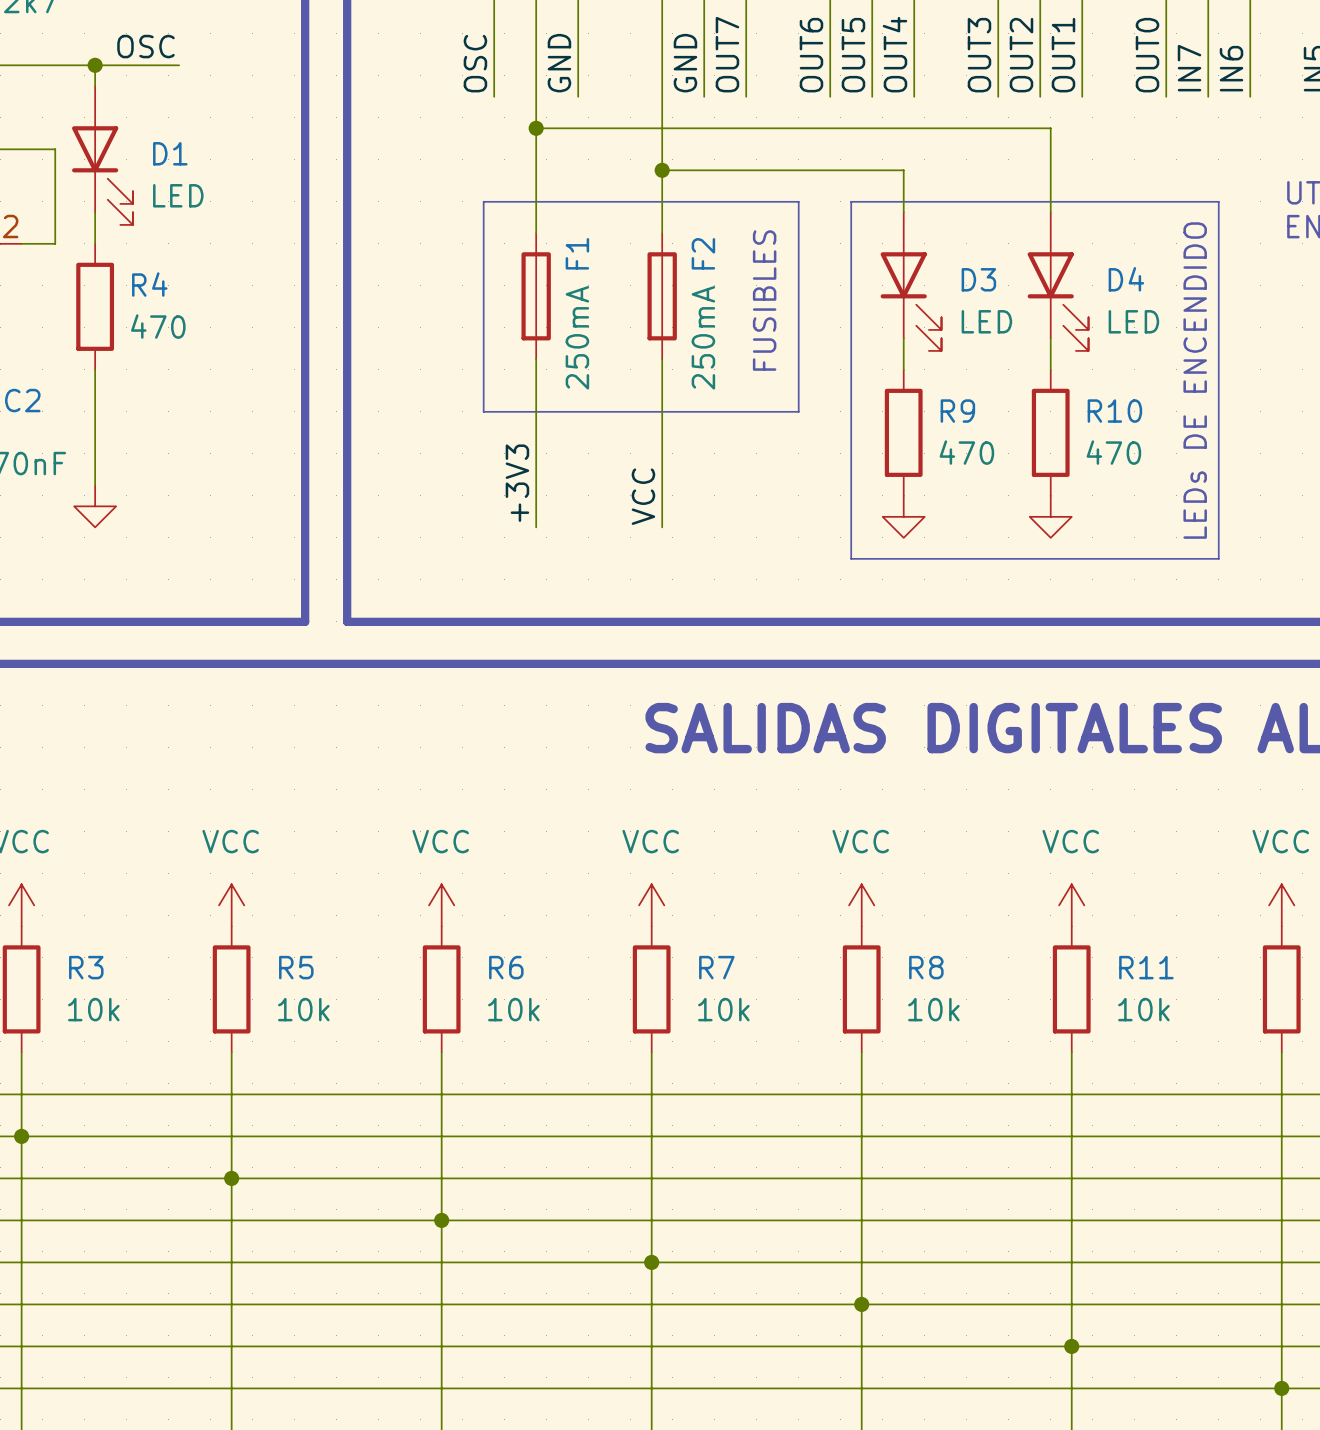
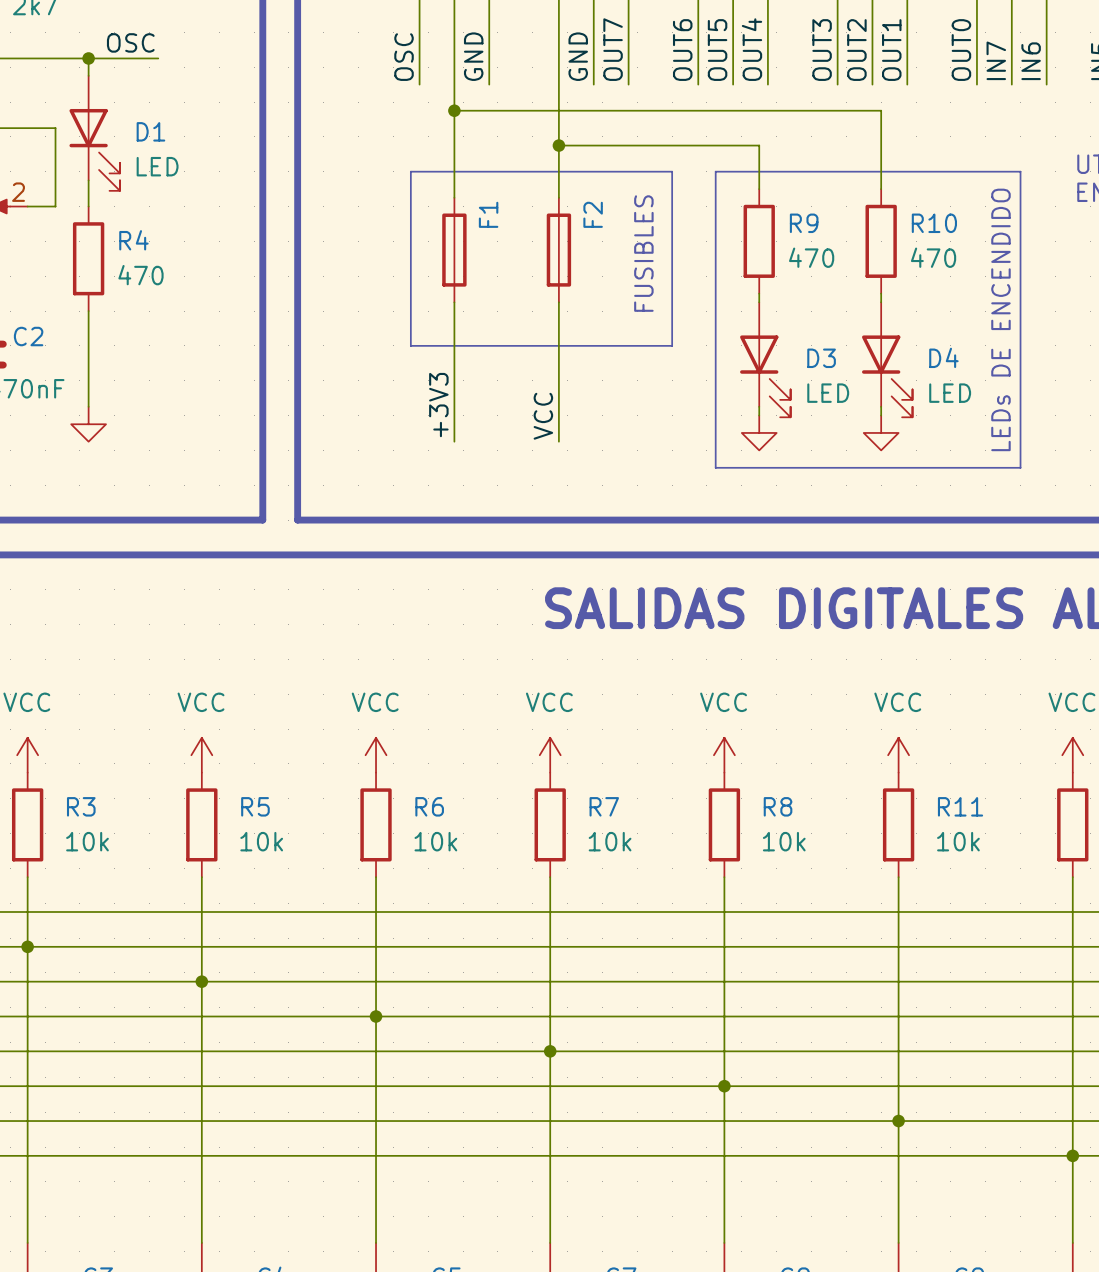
D3 position: (911, 281) -> (765, 359)
D4 position: (1058, 281) -> (887, 359)
F1 value: 250mA (577, 337) -> none
F2 value: 250mA (703, 337) -> none
R9 position: (903, 432) -> (759, 241)
R10 position: (1050, 432) -> (881, 241)

